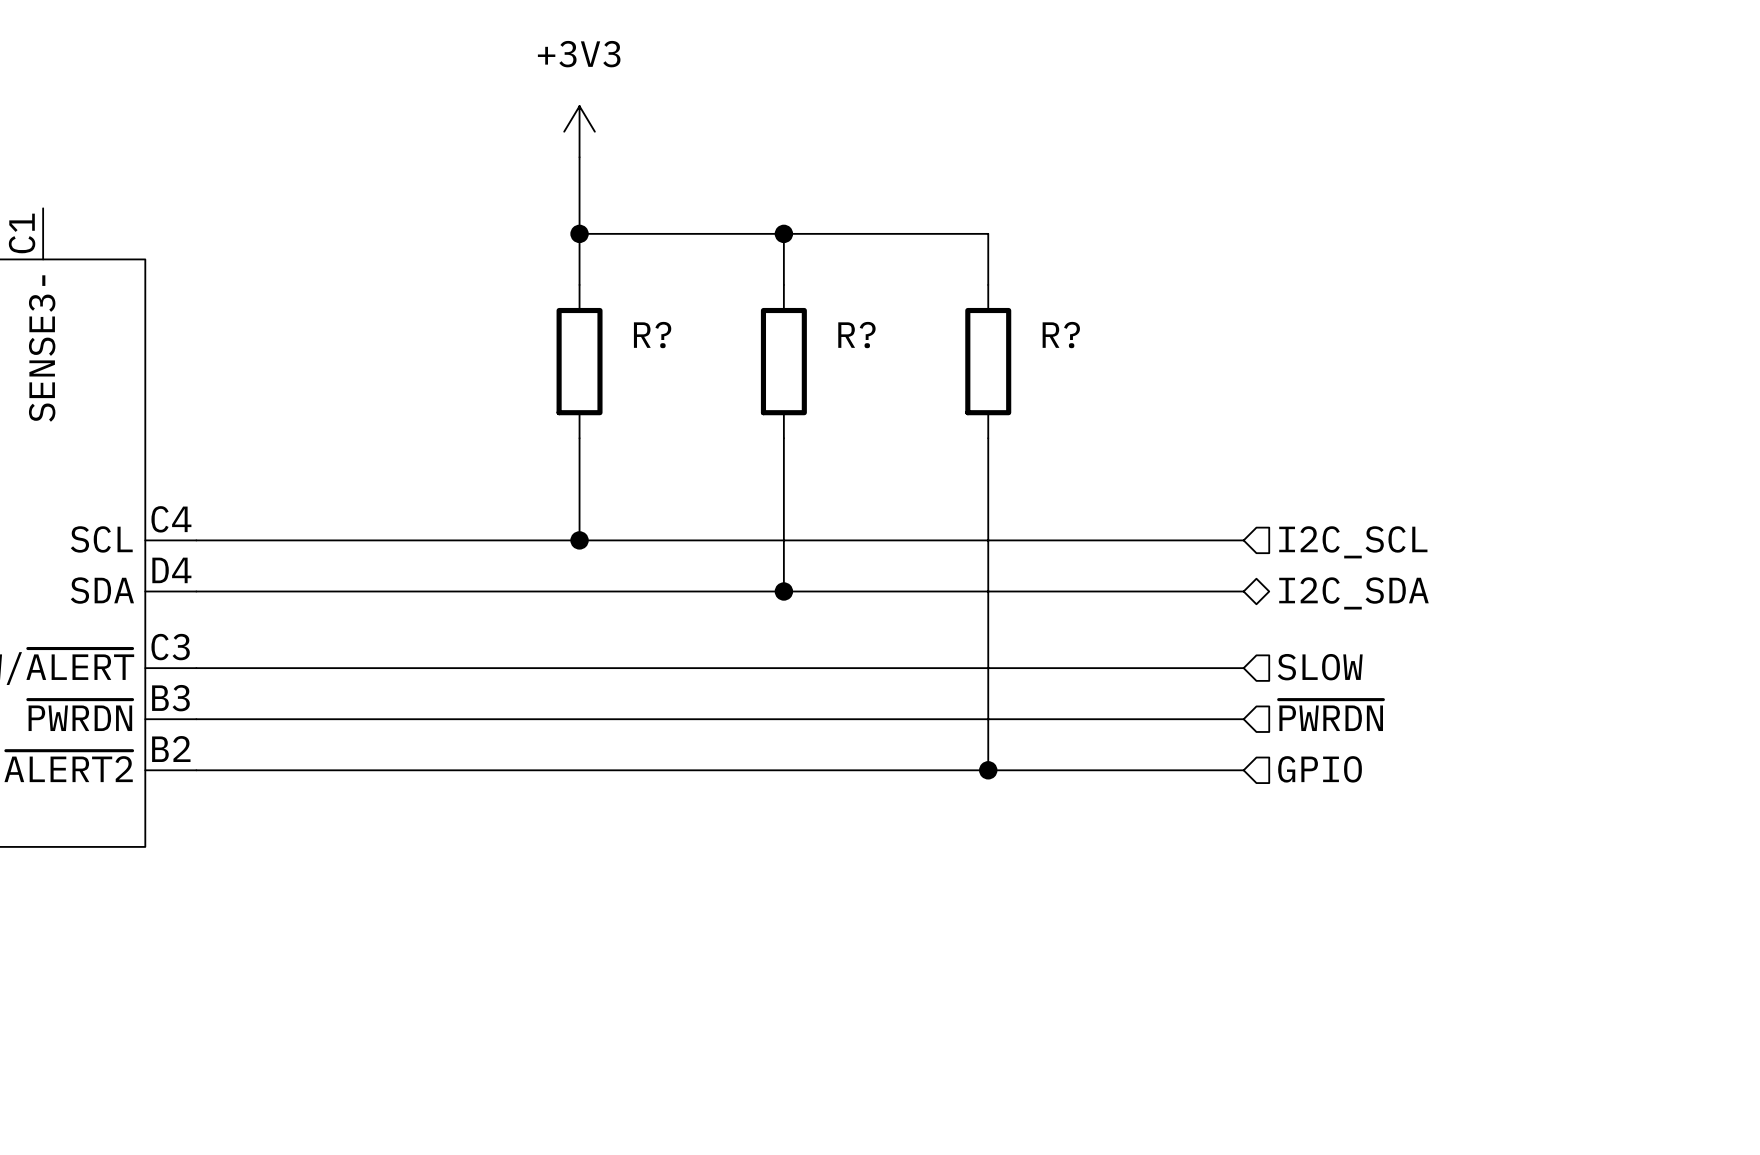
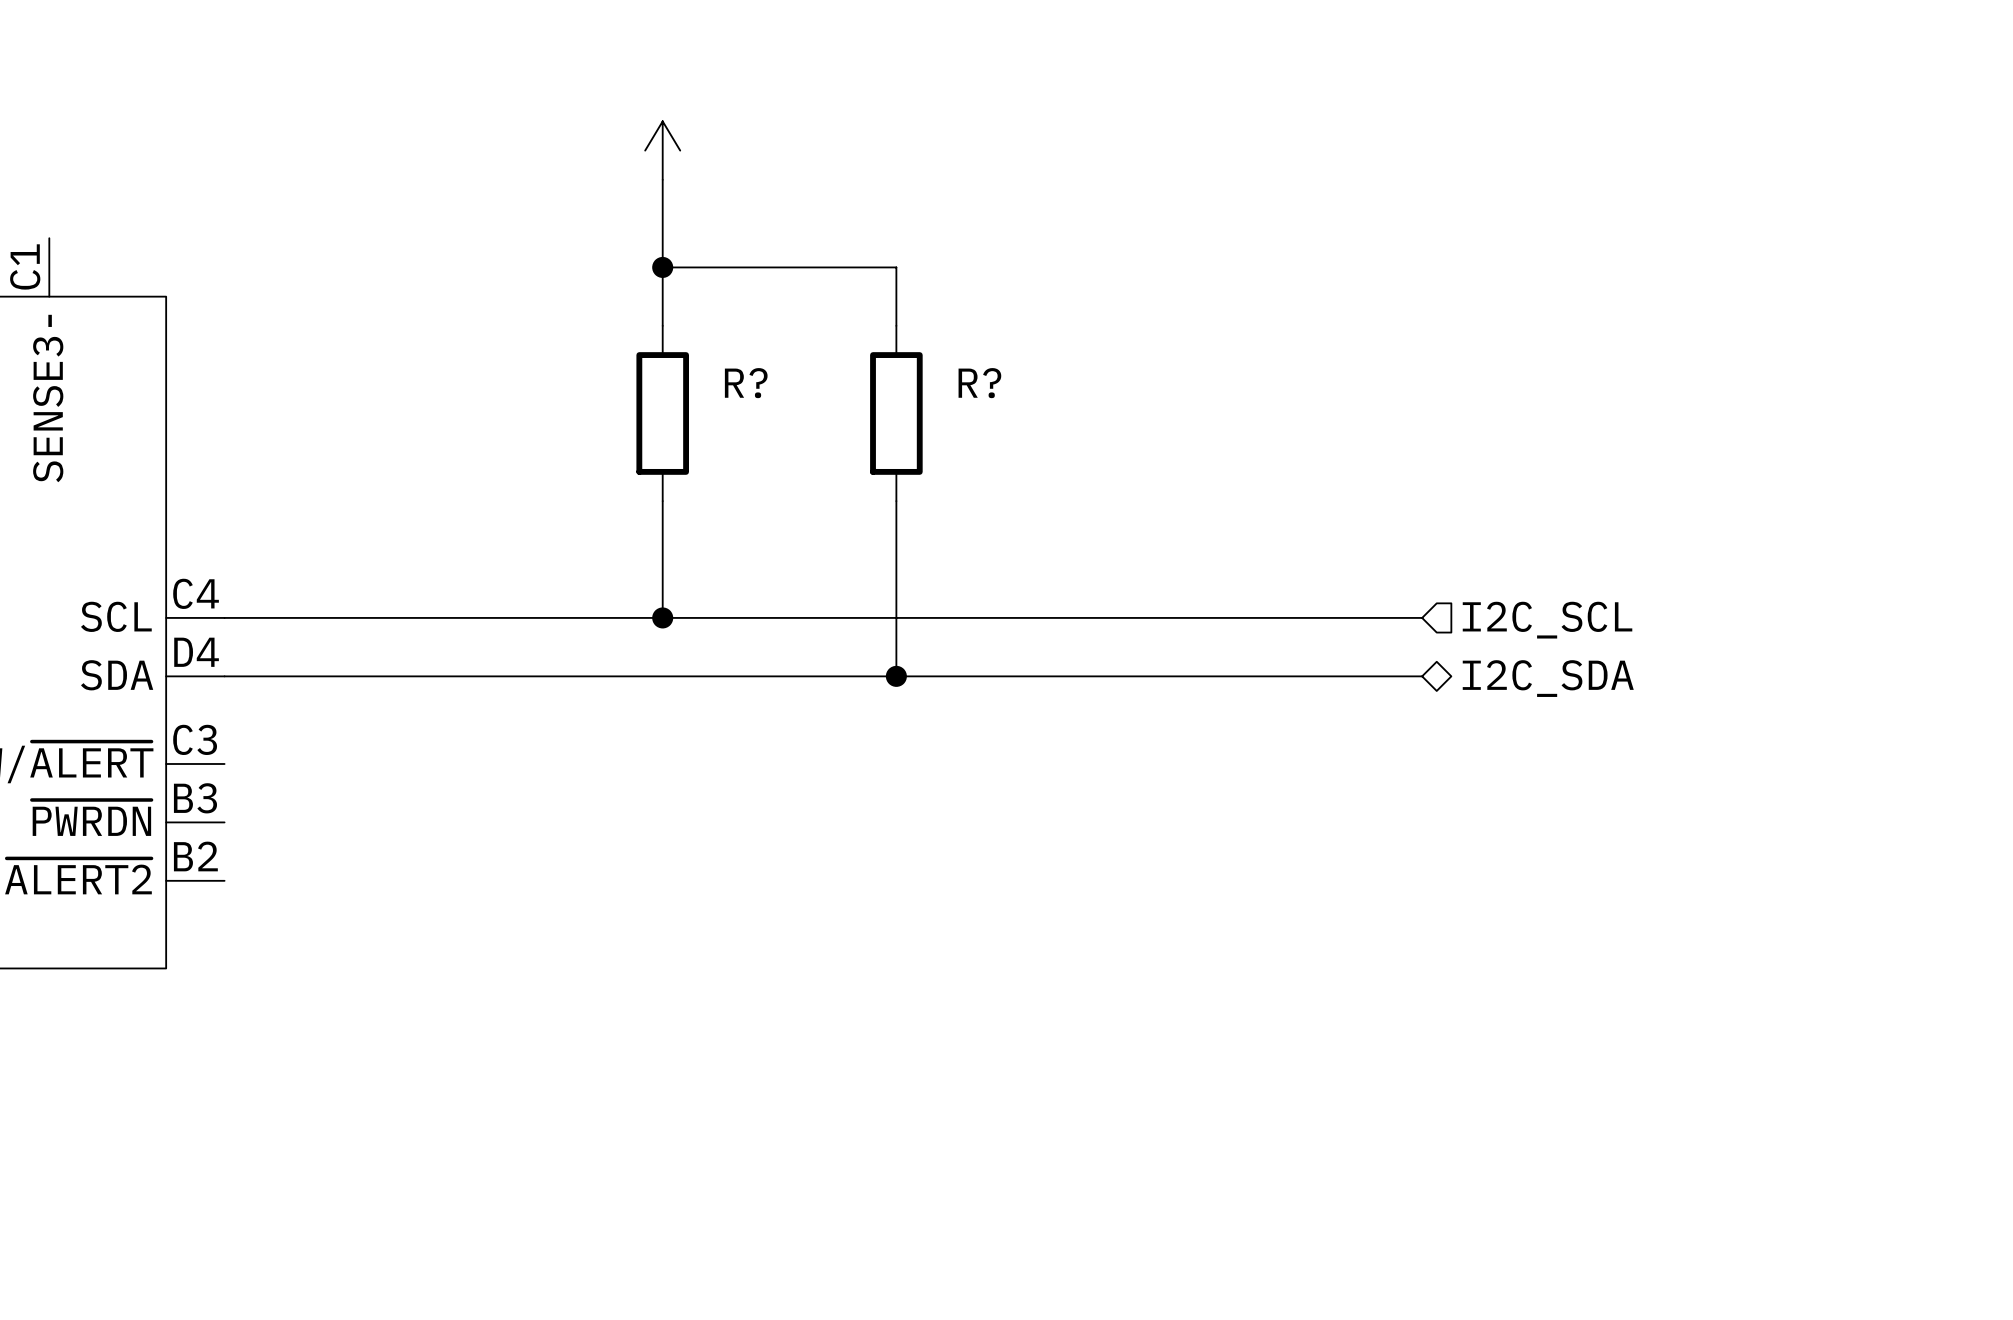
power symbol text: +3V3 (579, 54) -> none
wire: (783, 233) (988, 233) (988, 284) -> none
junction: (783, 233) -> none
R?: (988, 361) -> none
wire: (988, 438) (988, 770) -> none
hierarchical label: SLOW (1320, 667) -> none
wire: (196, 668) (1243, 668) -> none
hierarchical label: ~{PWRDN} (1331, 715) -> none
wire: (196, 719) (1243, 719) -> none
hierarchical label: GPIO (1320, 769) -> none
wire: (196, 770) (1243, 770) -> none
junction: (988, 770) -> none

